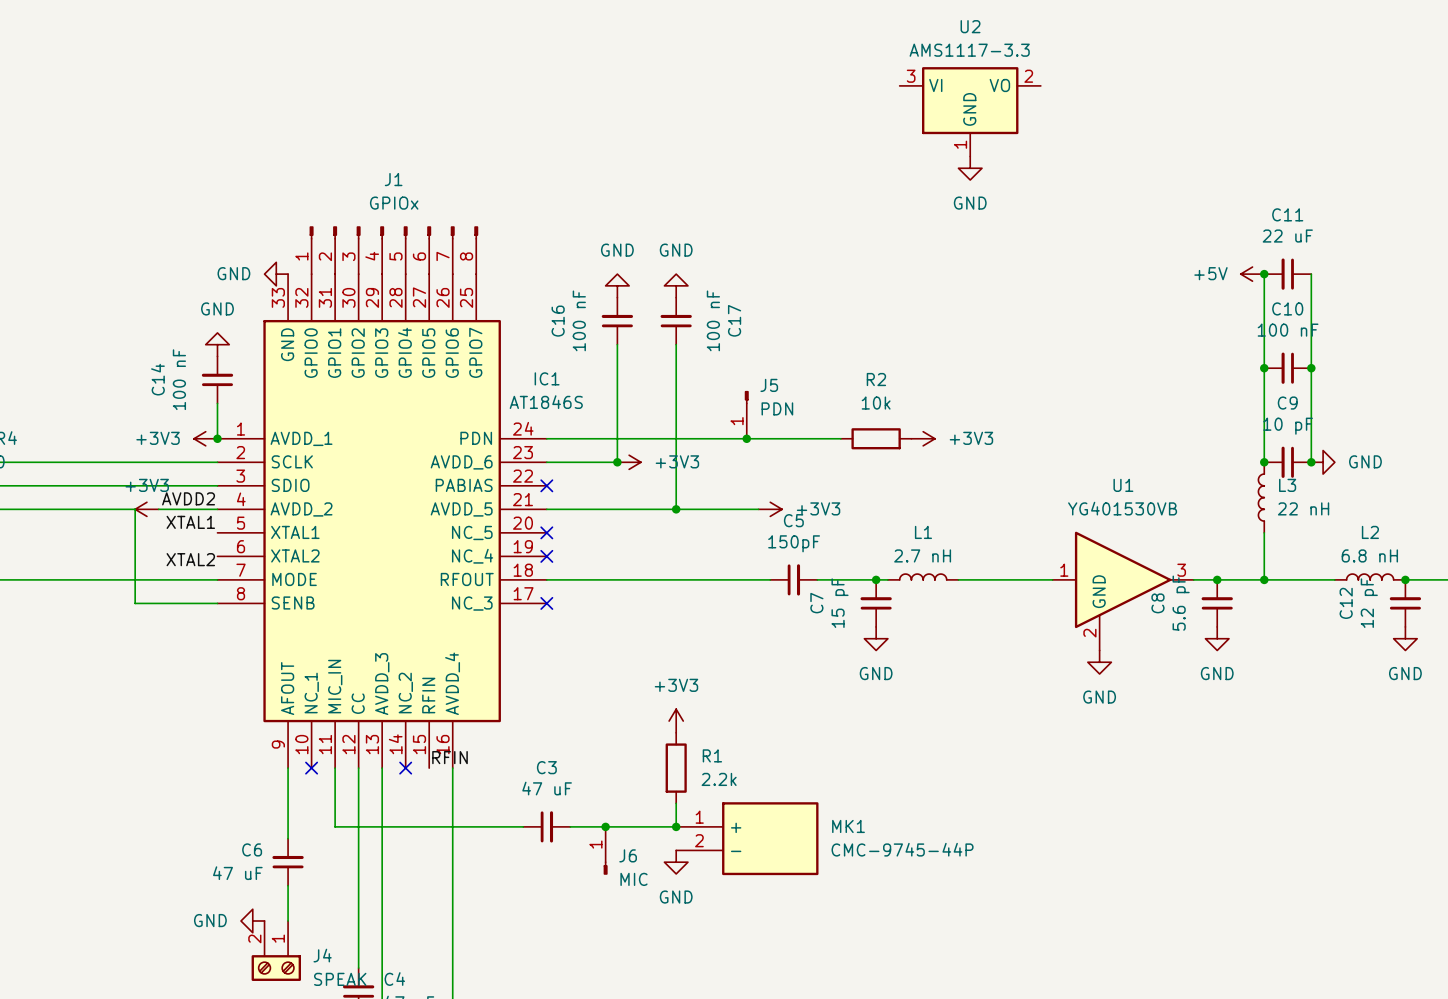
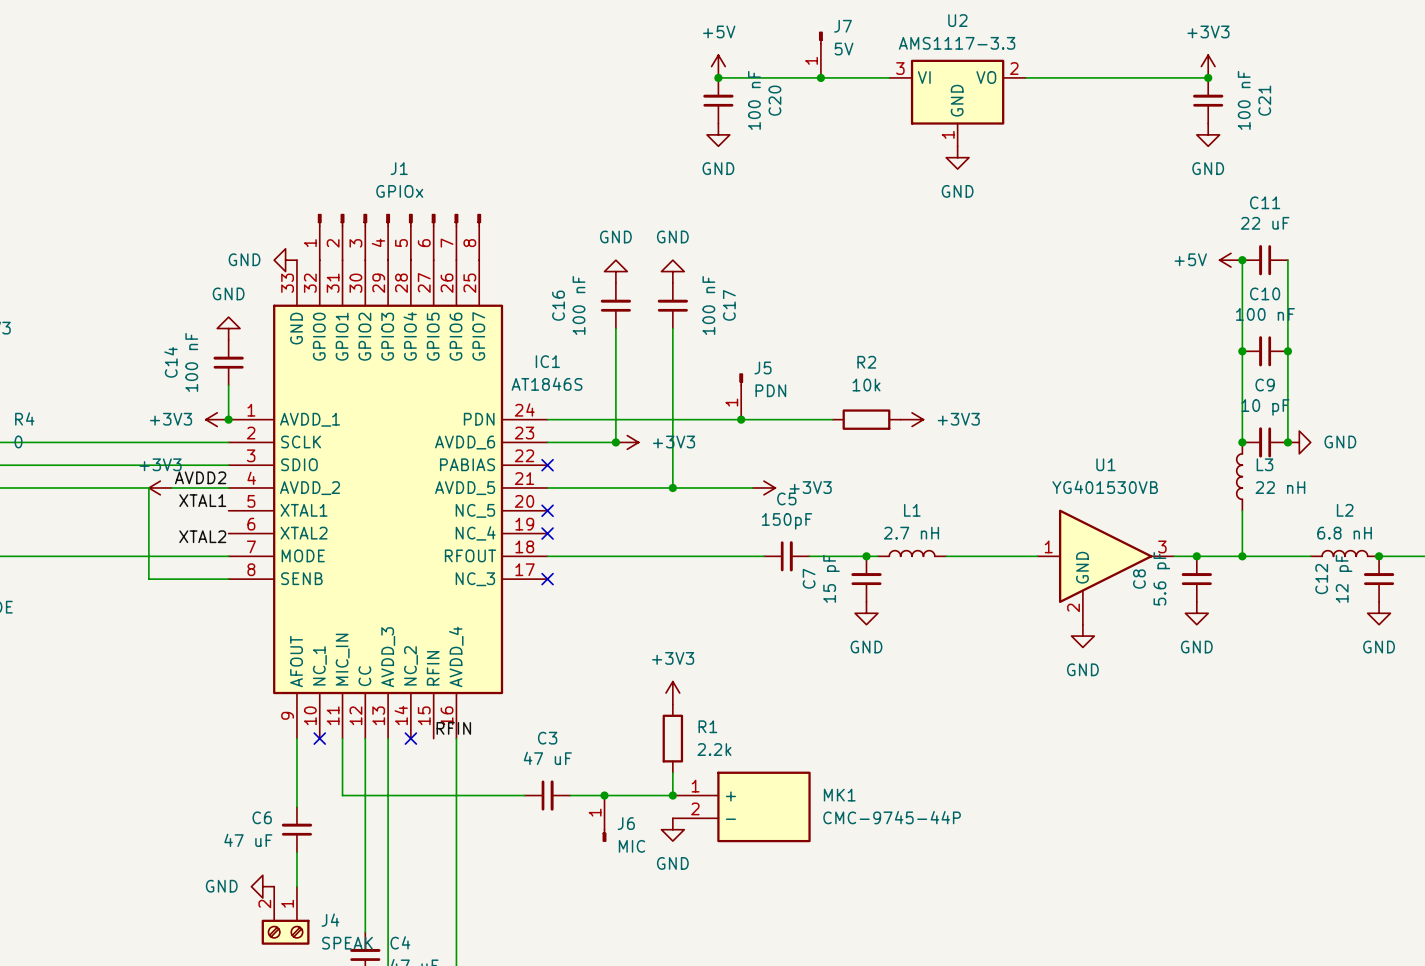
J7: none -> 5V (820, 54)
power symbol: none -> +5V (718, 66)
power symbol: none -> +3V3 (1208, 66)
wire: none -> (718, 77) (889, 77)
junction: none -> (718, 77)
junction: none -> (820, 77)
wire: none -> (1025, 77) (1208, 77)
junction: none -> (1208, 77)
C20: none -> 100 nF (718, 100)
C21: none -> 100 nF (1208, 100)
power symbol: none -> GND (718, 134)
power symbol: none -> GND (1208, 134)

